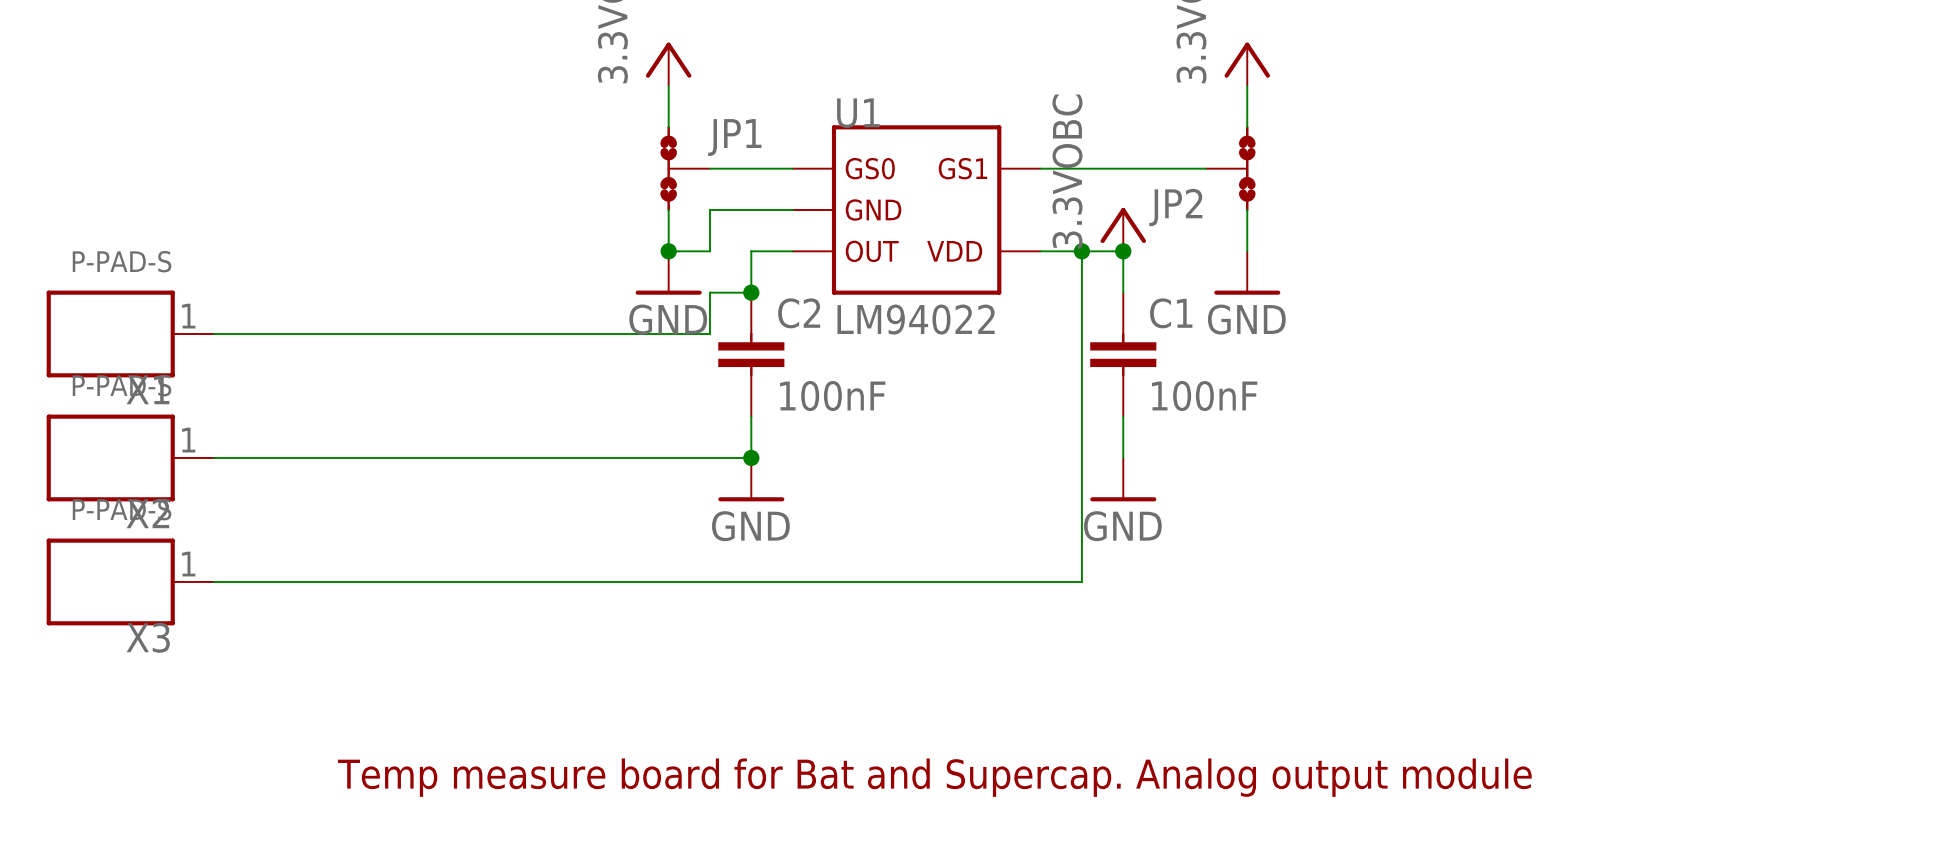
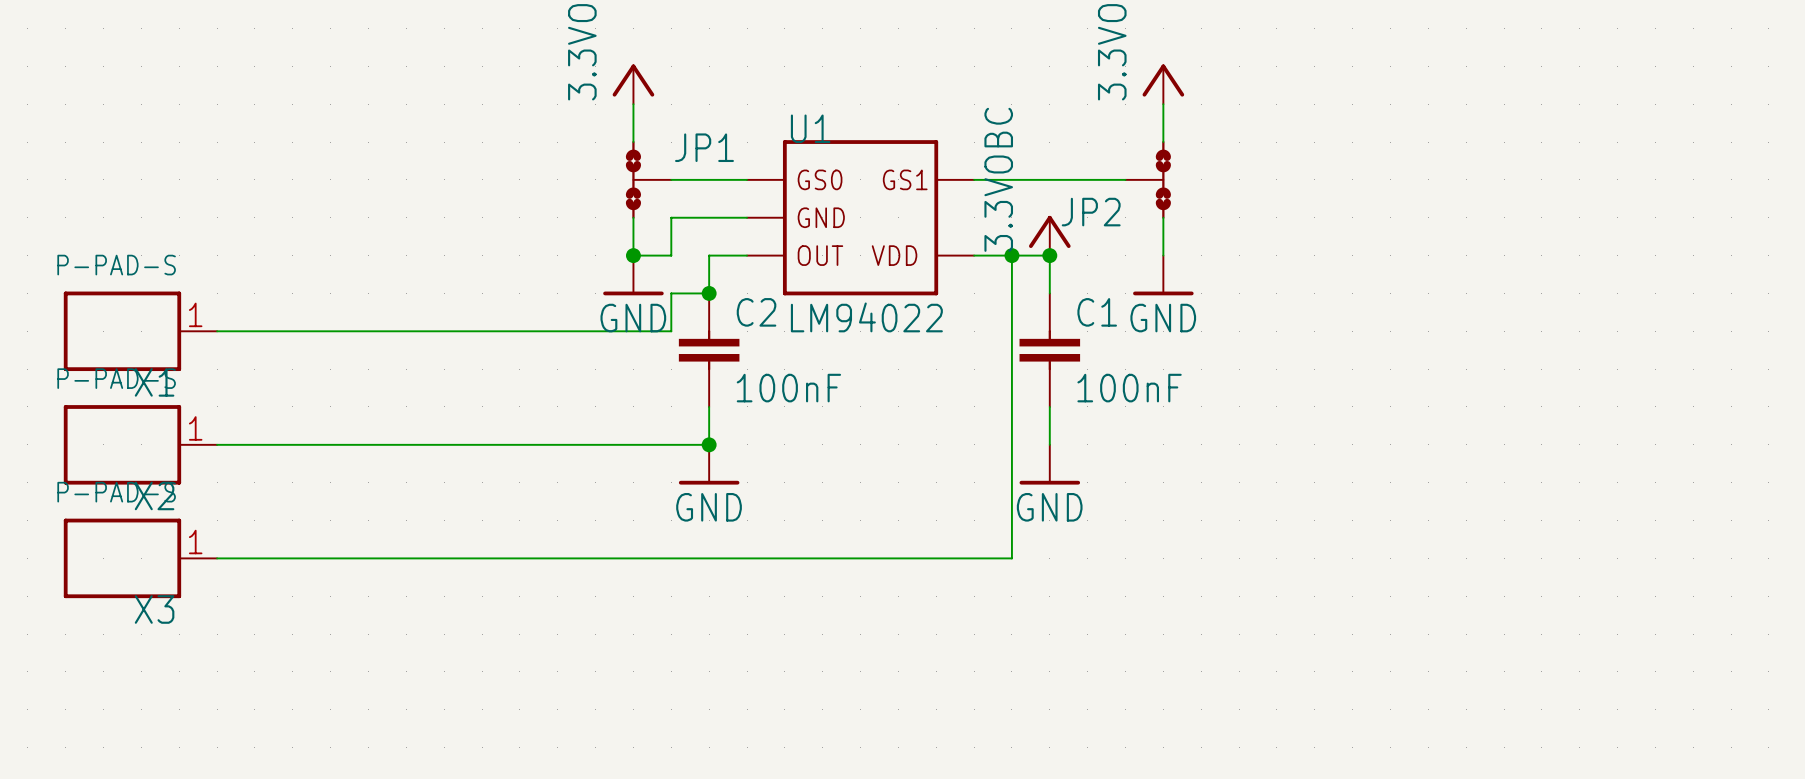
text: Temp measure board for Bat and Supercap. Analog output module (934, 777) -> none

